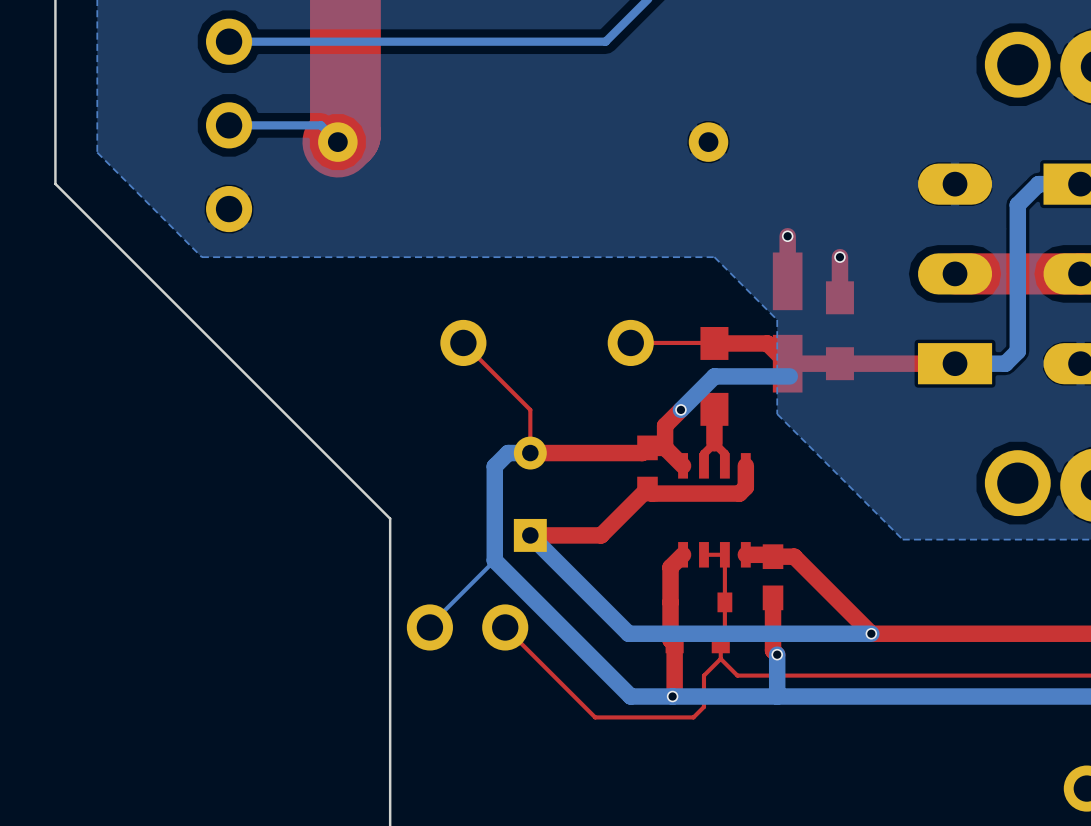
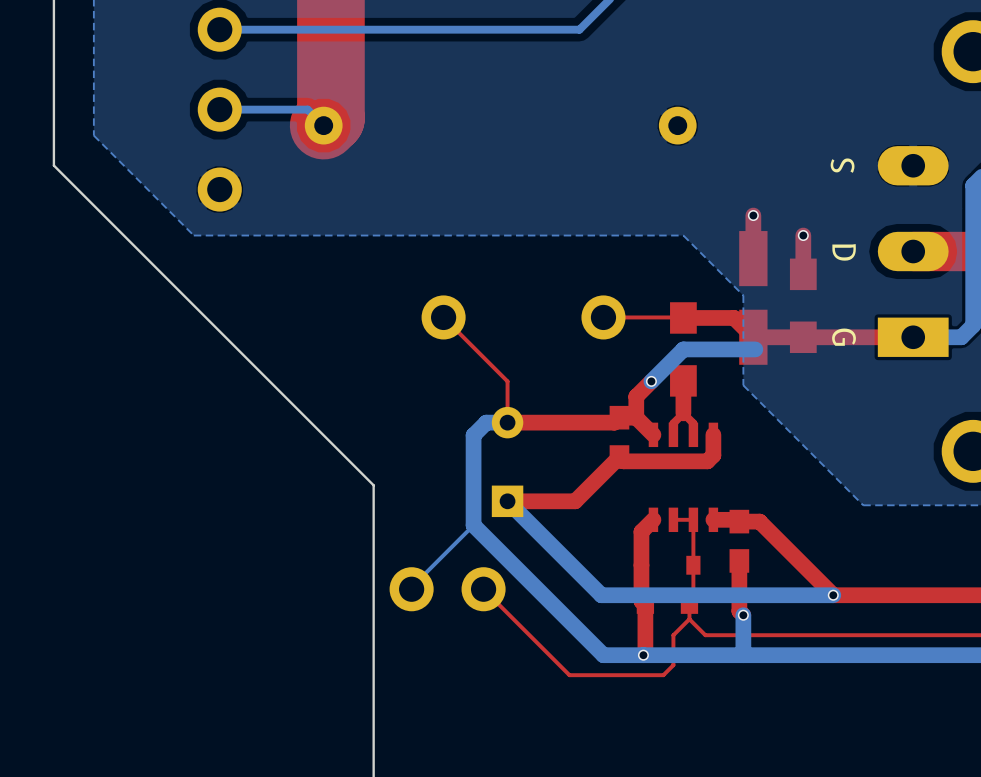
text: none -> S (842, 165)
text: none -> D (844, 252)
text: none -> G (844, 337)

